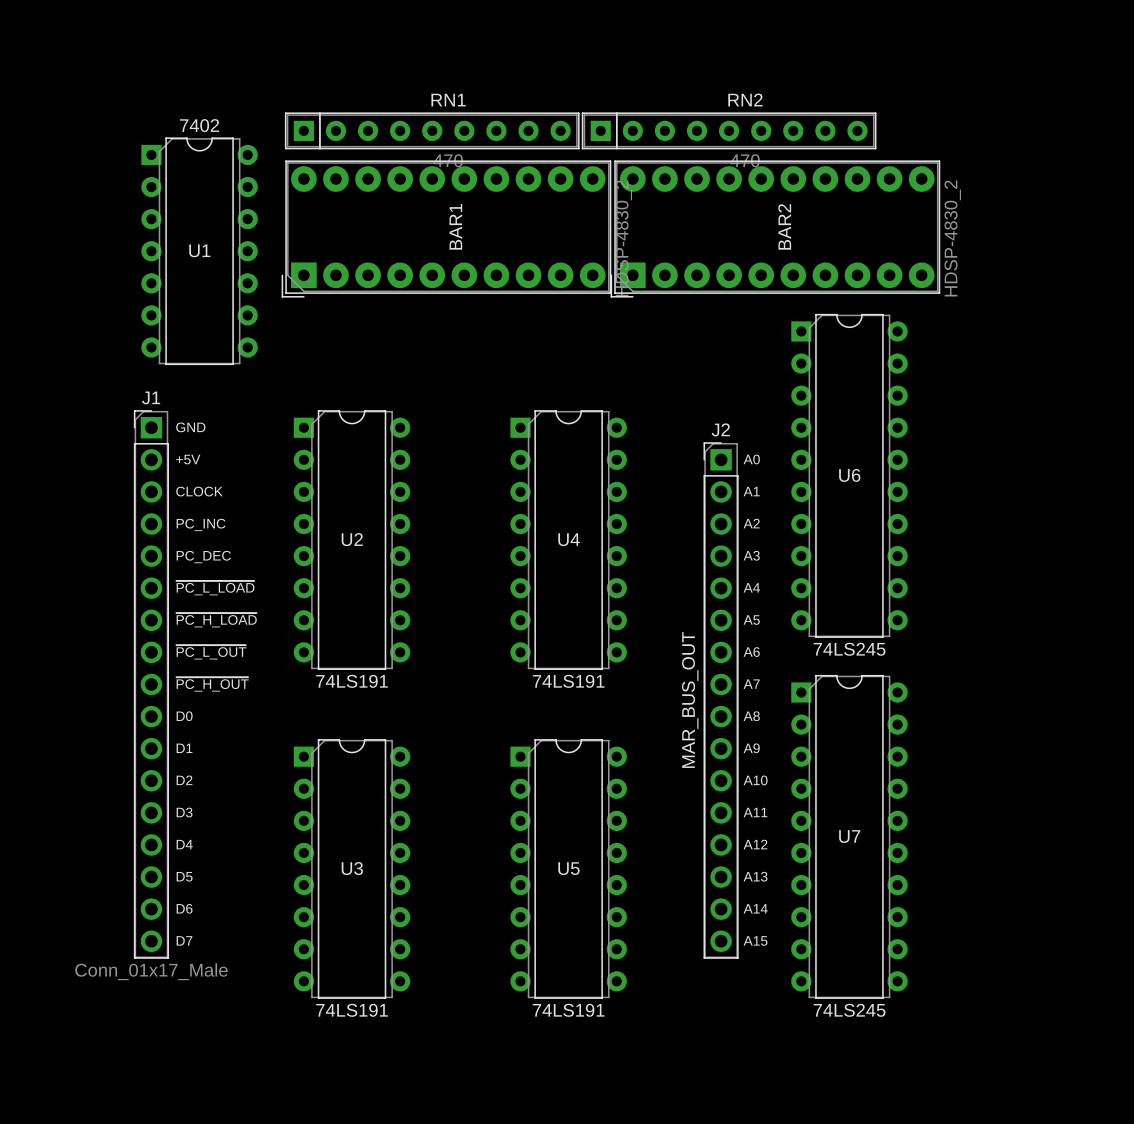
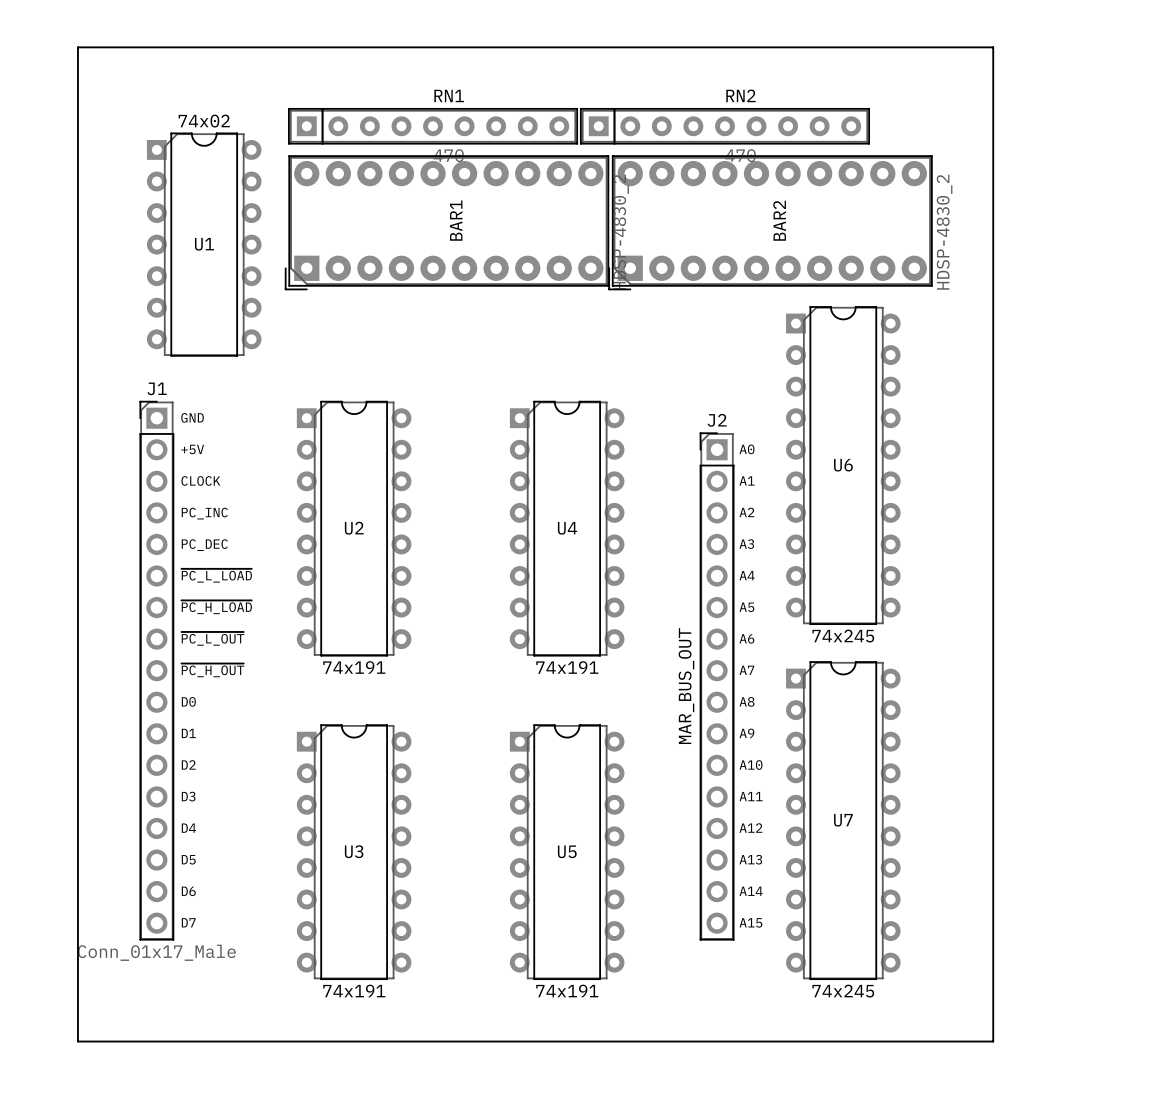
board edge: none -> (77, 47) (77, 1041) (993, 1041) (993, 47) (77, 47)
U1 value: 7402 (199, 125) -> 74x02 (204, 121)
U6 value: 74LS245 (849, 649) -> 74x245 (843, 636)
U2 value: 74LS191 (352, 681) -> 74x191 (354, 667)
U4 value: 74LS191 (568, 681) -> 74x191 (567, 667)
U3 value: 74LS191 (352, 1010) -> 74x191 (354, 990)
U5 value: 74LS191 (568, 1010) -> 74x191 (567, 990)
U7 value: 74LS245 (849, 1010) -> 74x245 (843, 991)

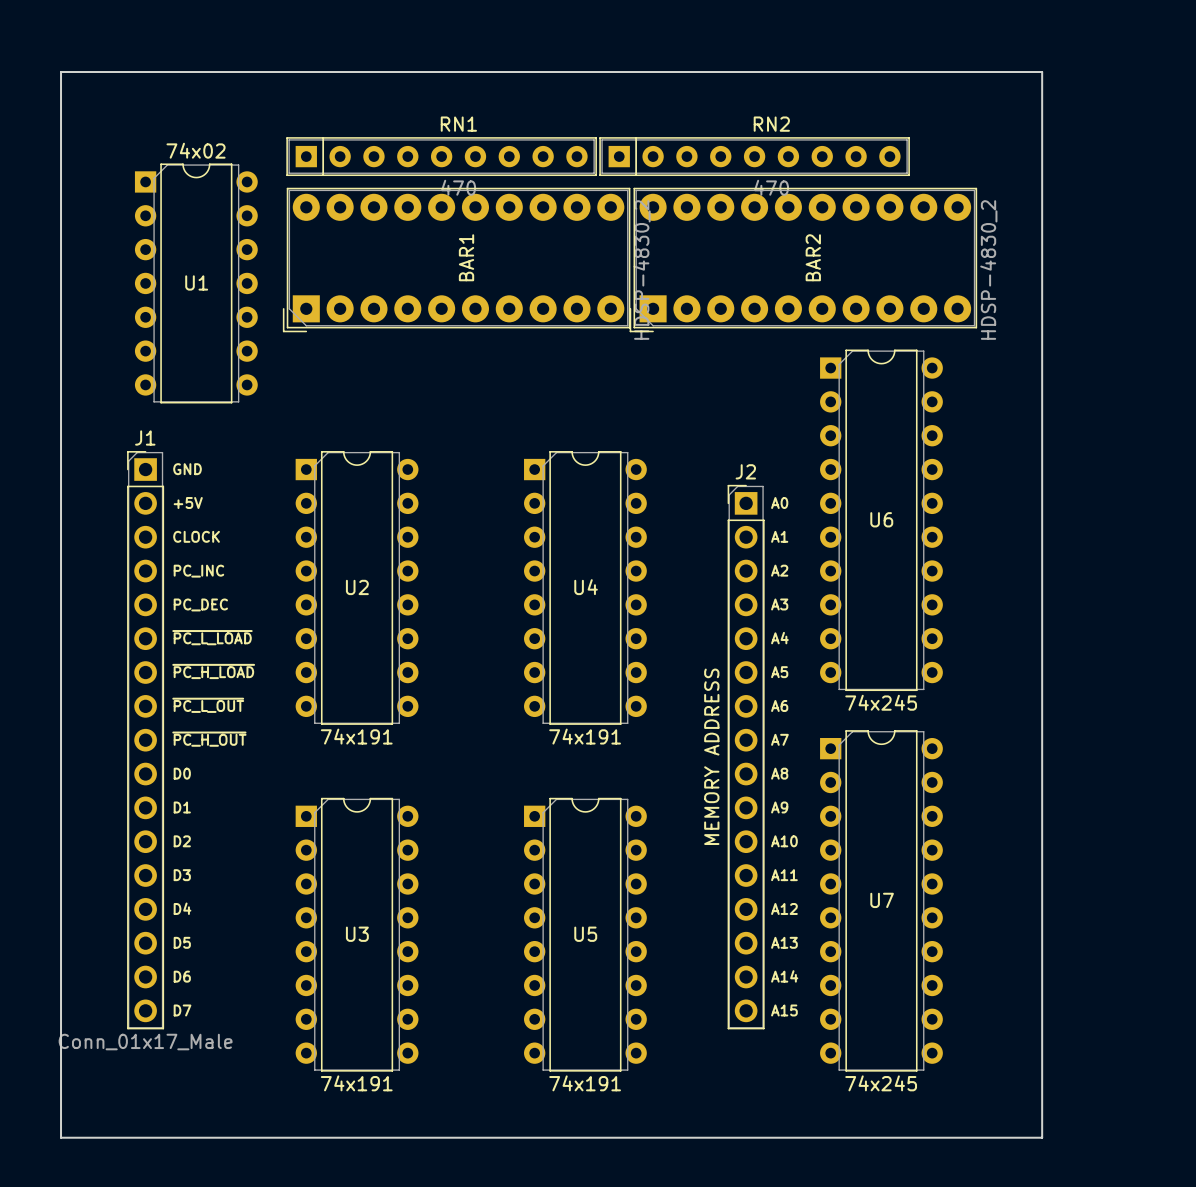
J2 value: MAR_BUS_OUT (686, 686) -> MEMORY ADDRESS (711, 756)

